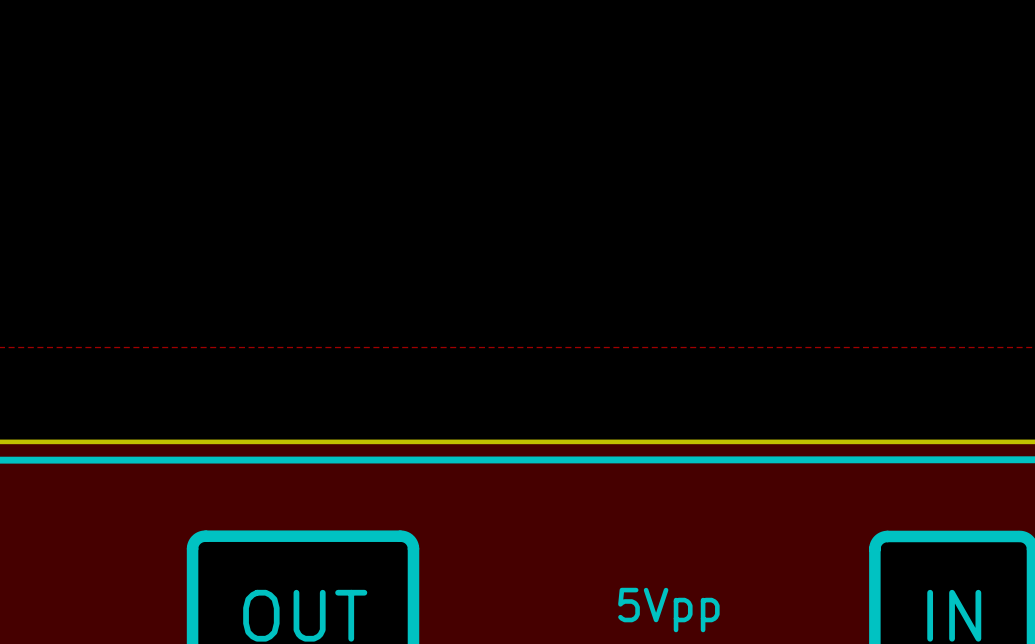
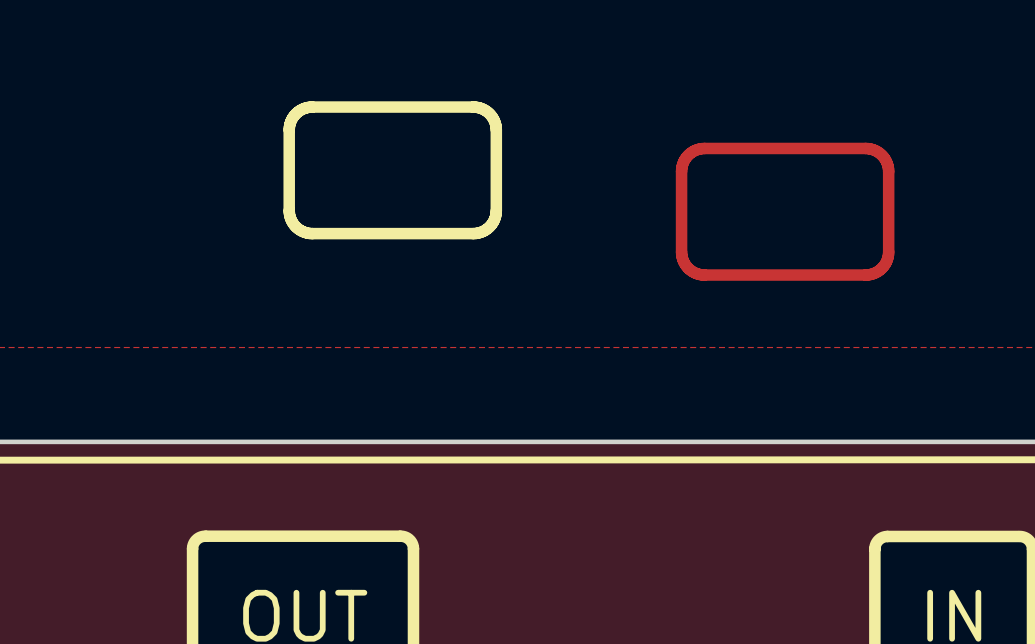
line: none -> (312, 107) (302, 109) (295, 113) (289, 127) (289, 213) (292, 222) (299, 230) (312, 233) (473, 233) (485, 230) (492, 222) (496, 210) (496, 127) (492, 117) (485, 110) (473, 107) (312, 107)
track: none -> (704, 148) (690, 153) (683, 161) (681, 168) (681, 254) (685, 264) (692, 271) (704, 275) (865, 275) (877, 271) (885, 264) (888, 252) (888, 168) (885, 159) (877, 152) (865, 148) (704, 148)
text: 5Vpp (668, 610) -> none

